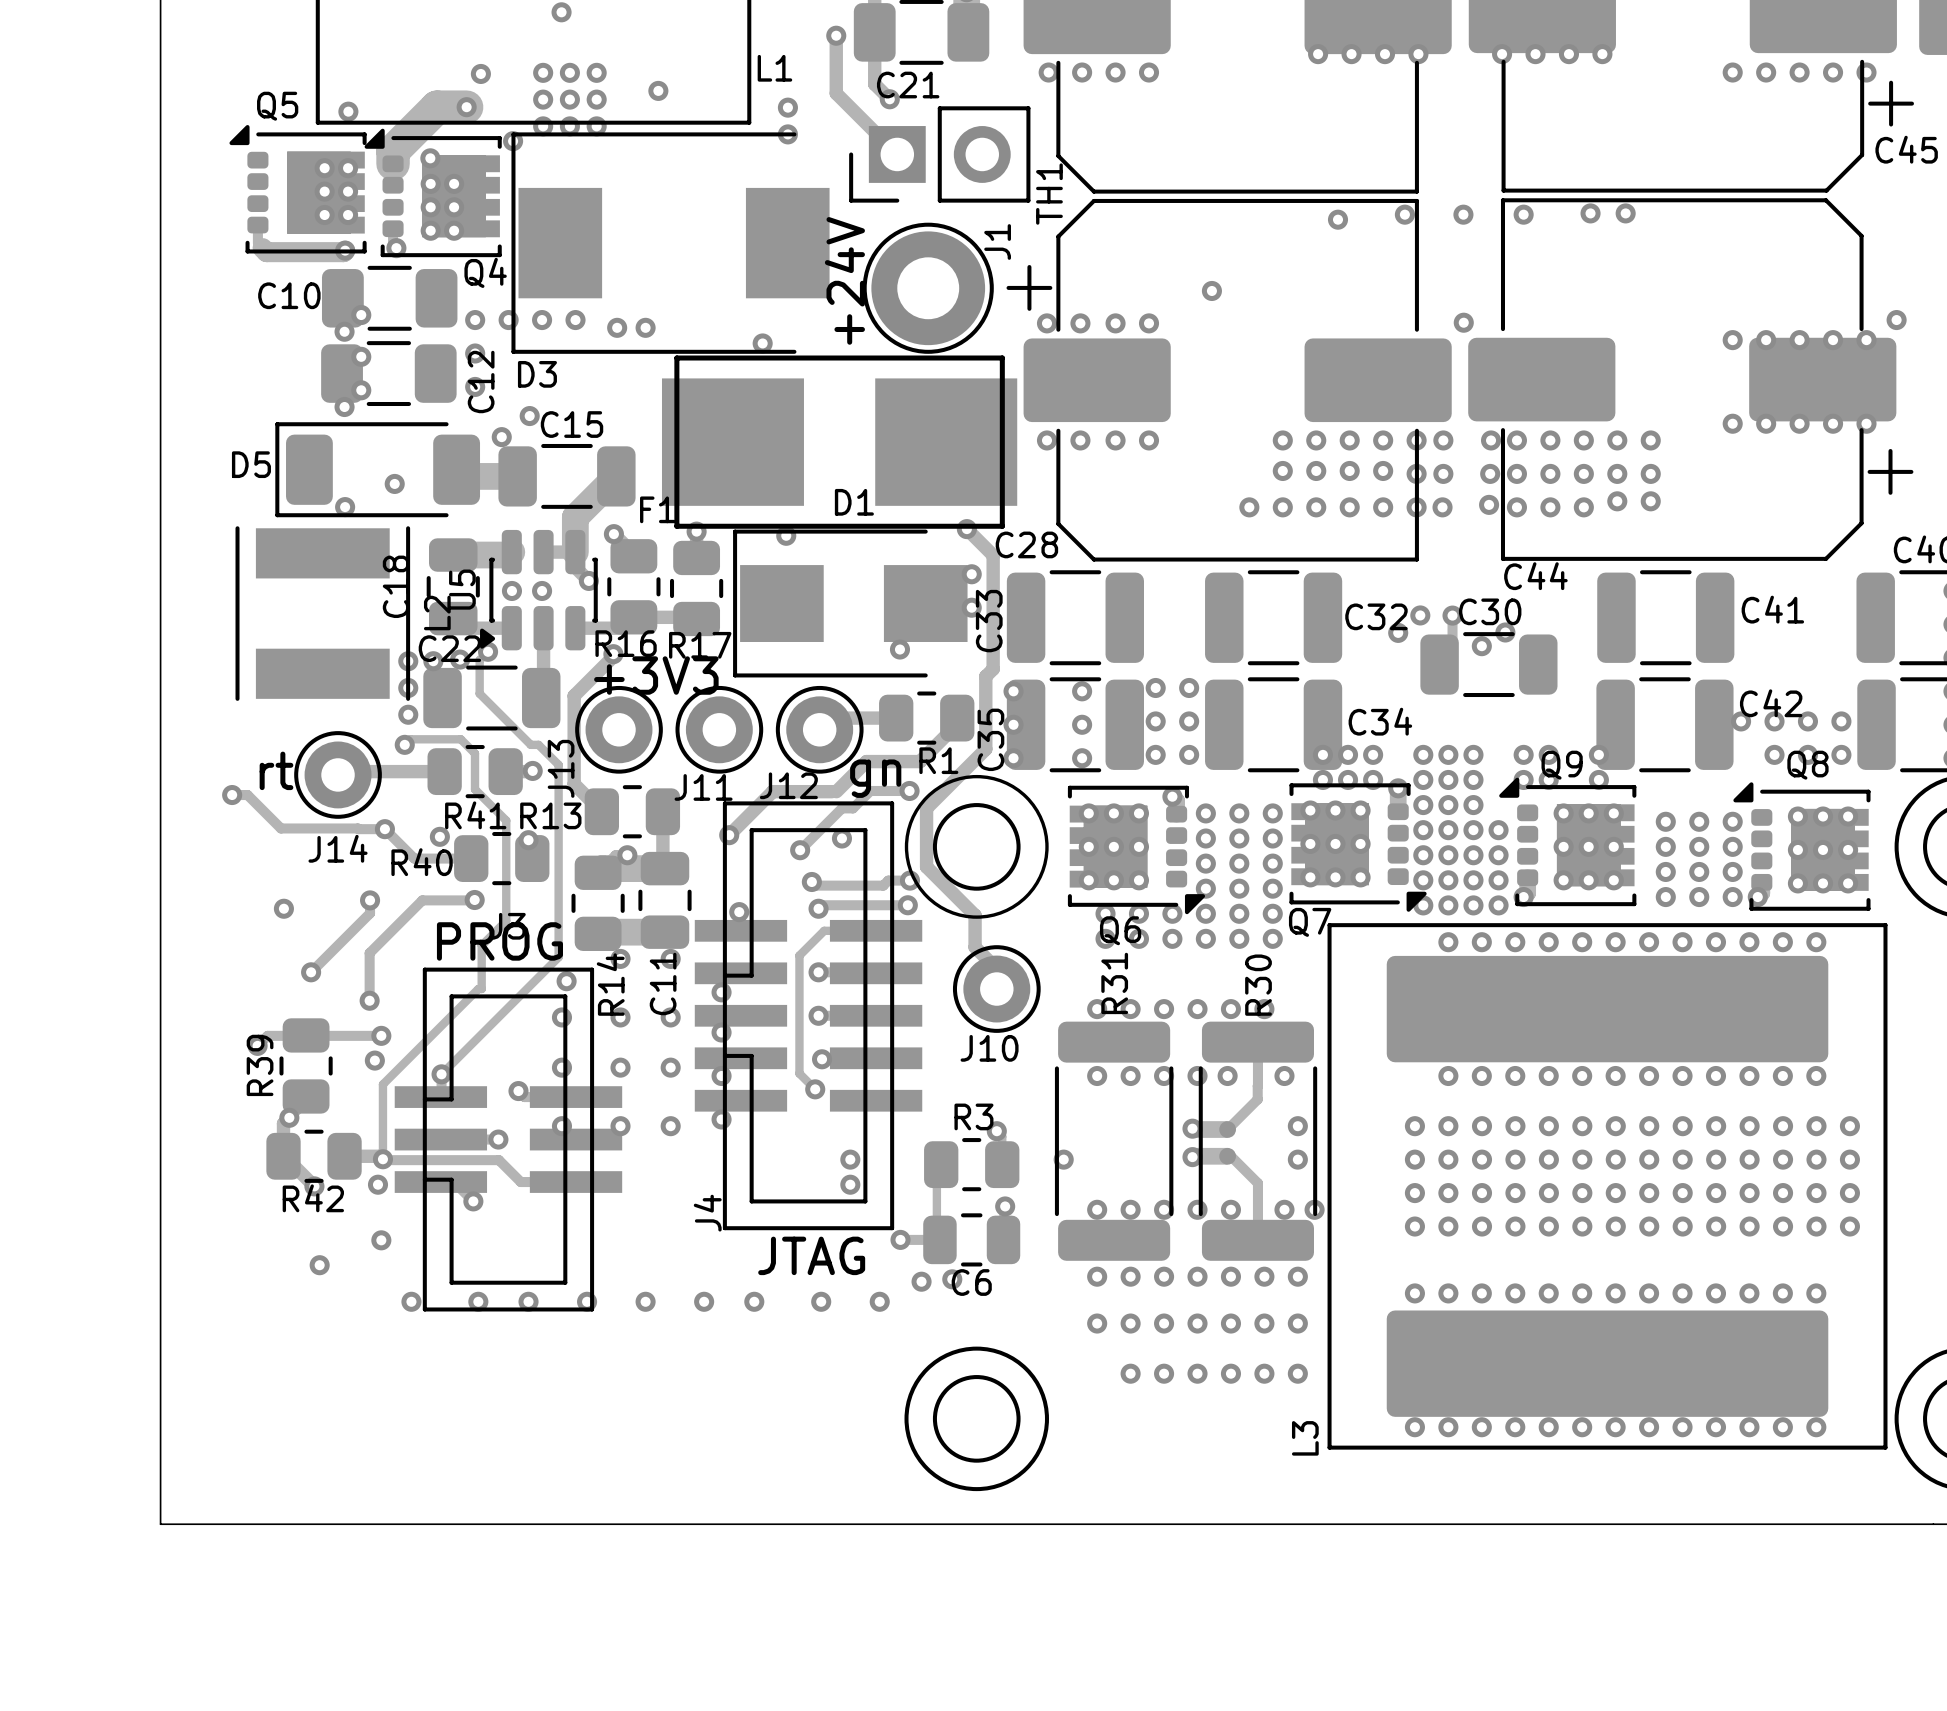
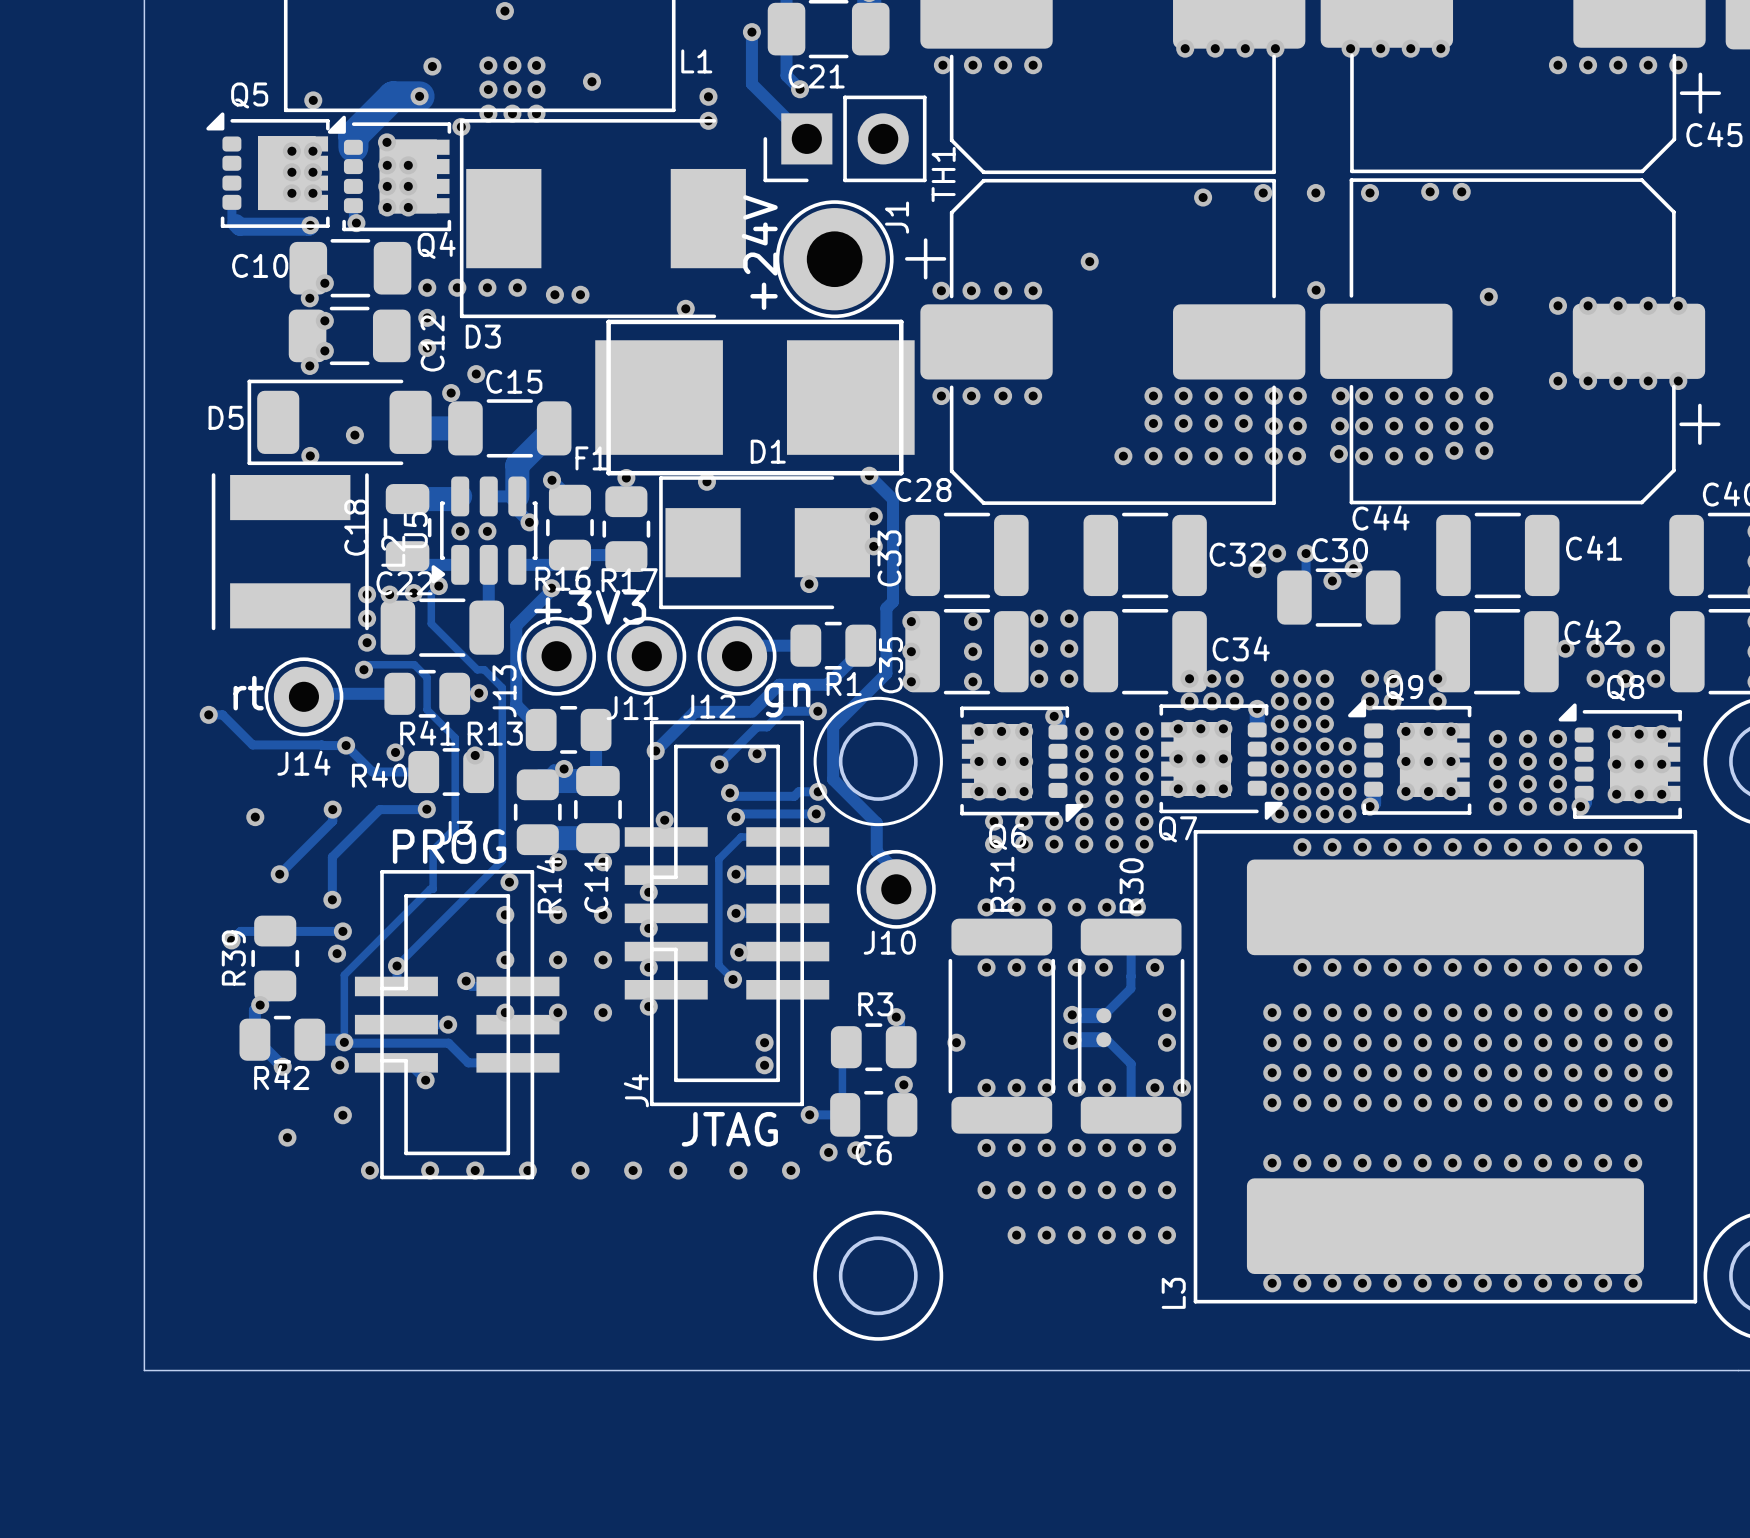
via: (1896, 320) -> none
via: none -> (1488, 296)

